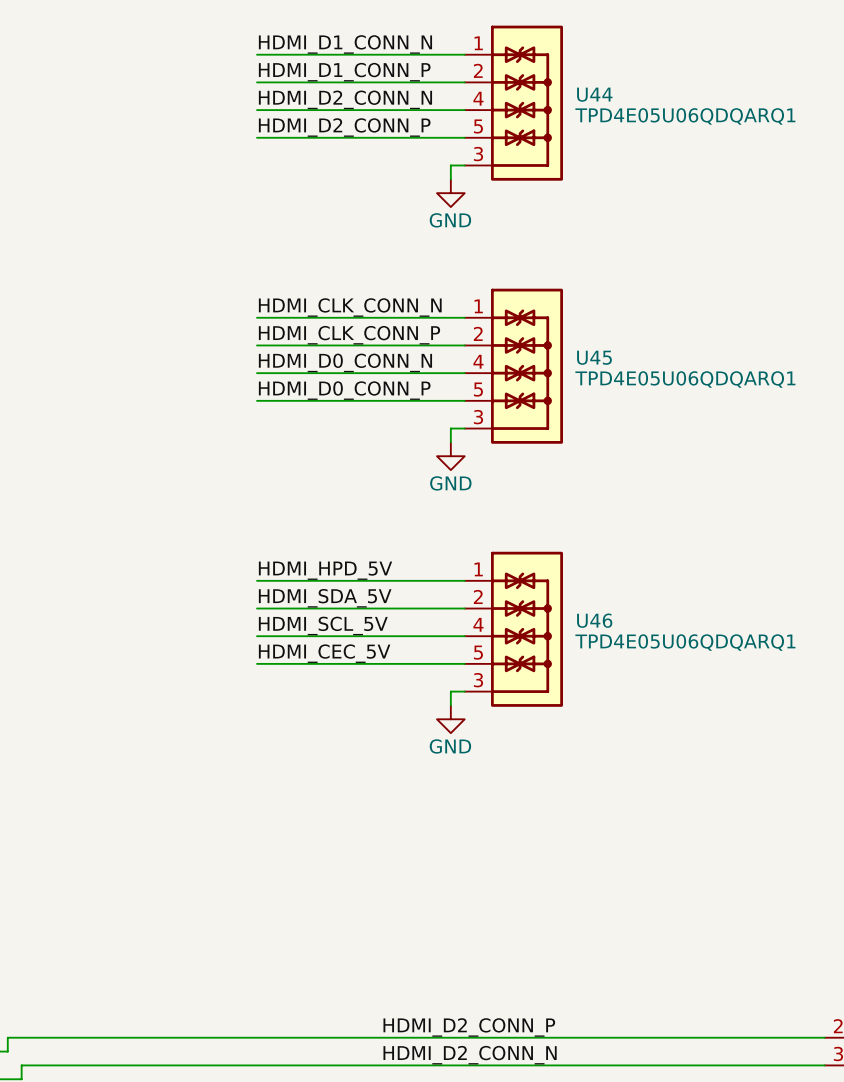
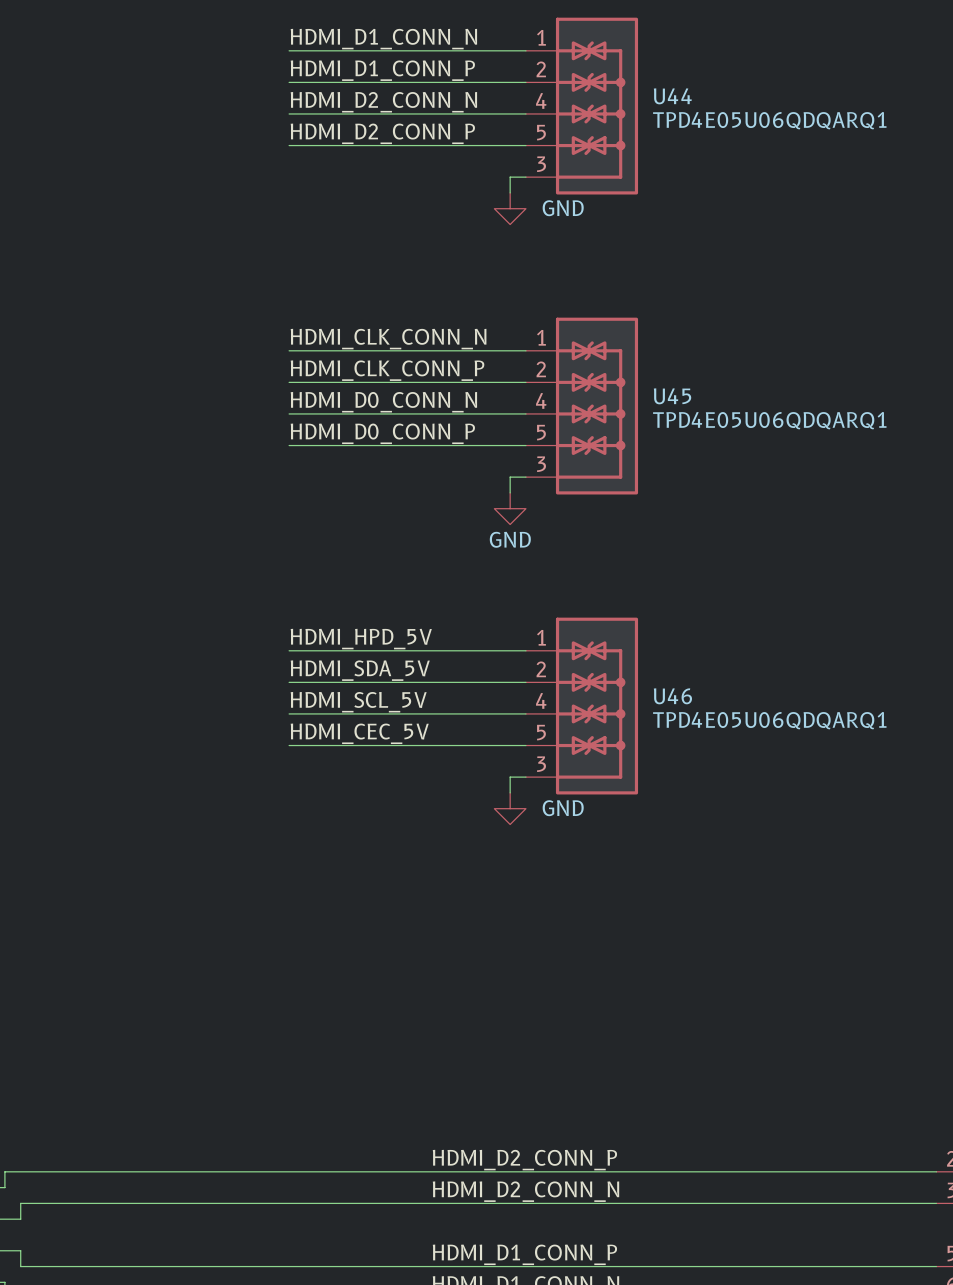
power symbol text position: GND (450, 220) -> GND (563, 208)
power symbol text position: GND (450, 746) -> GND (563, 808)

